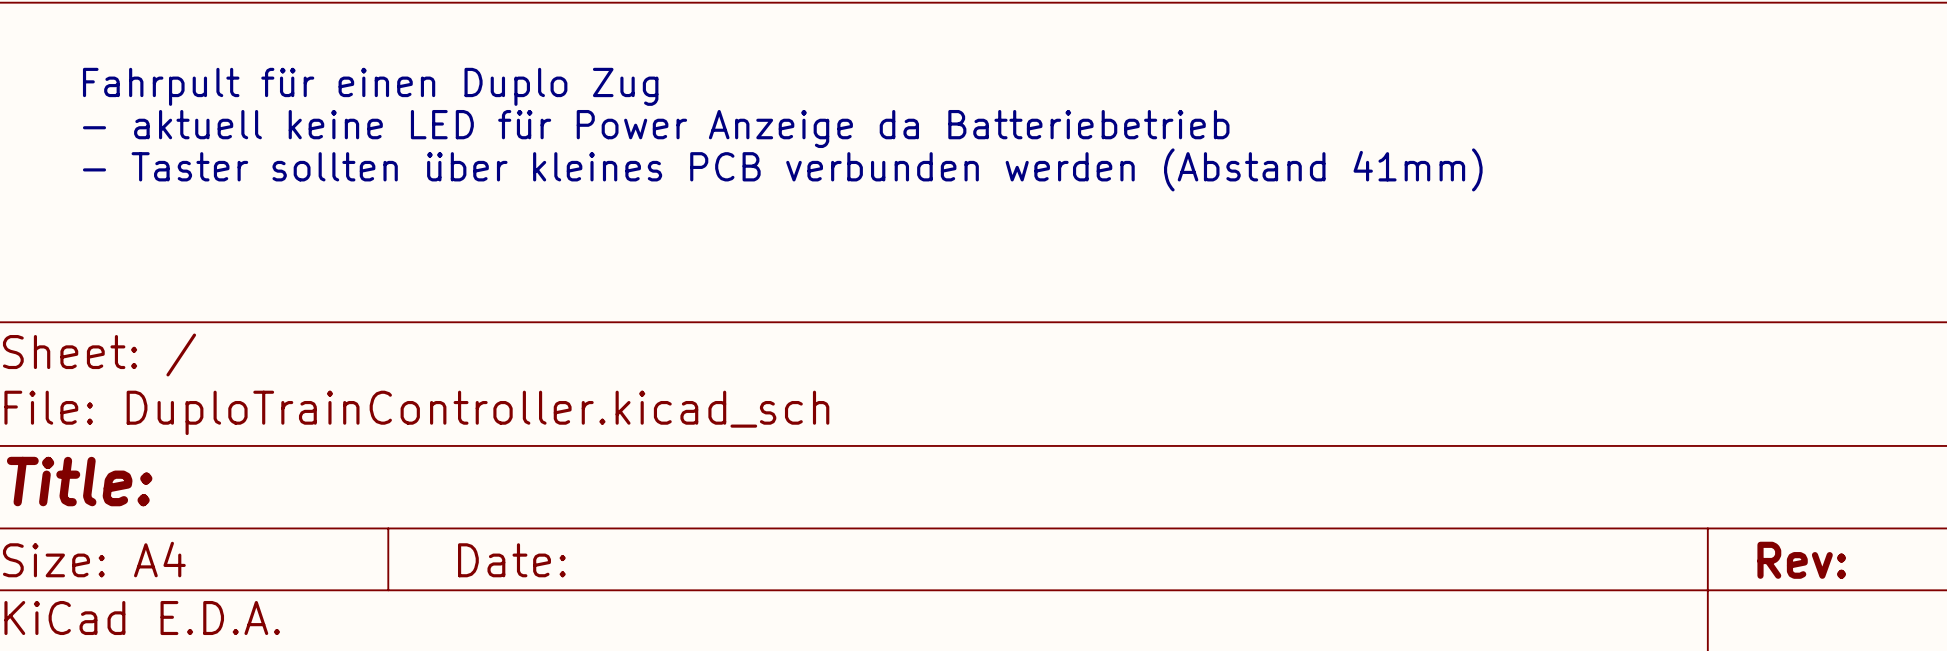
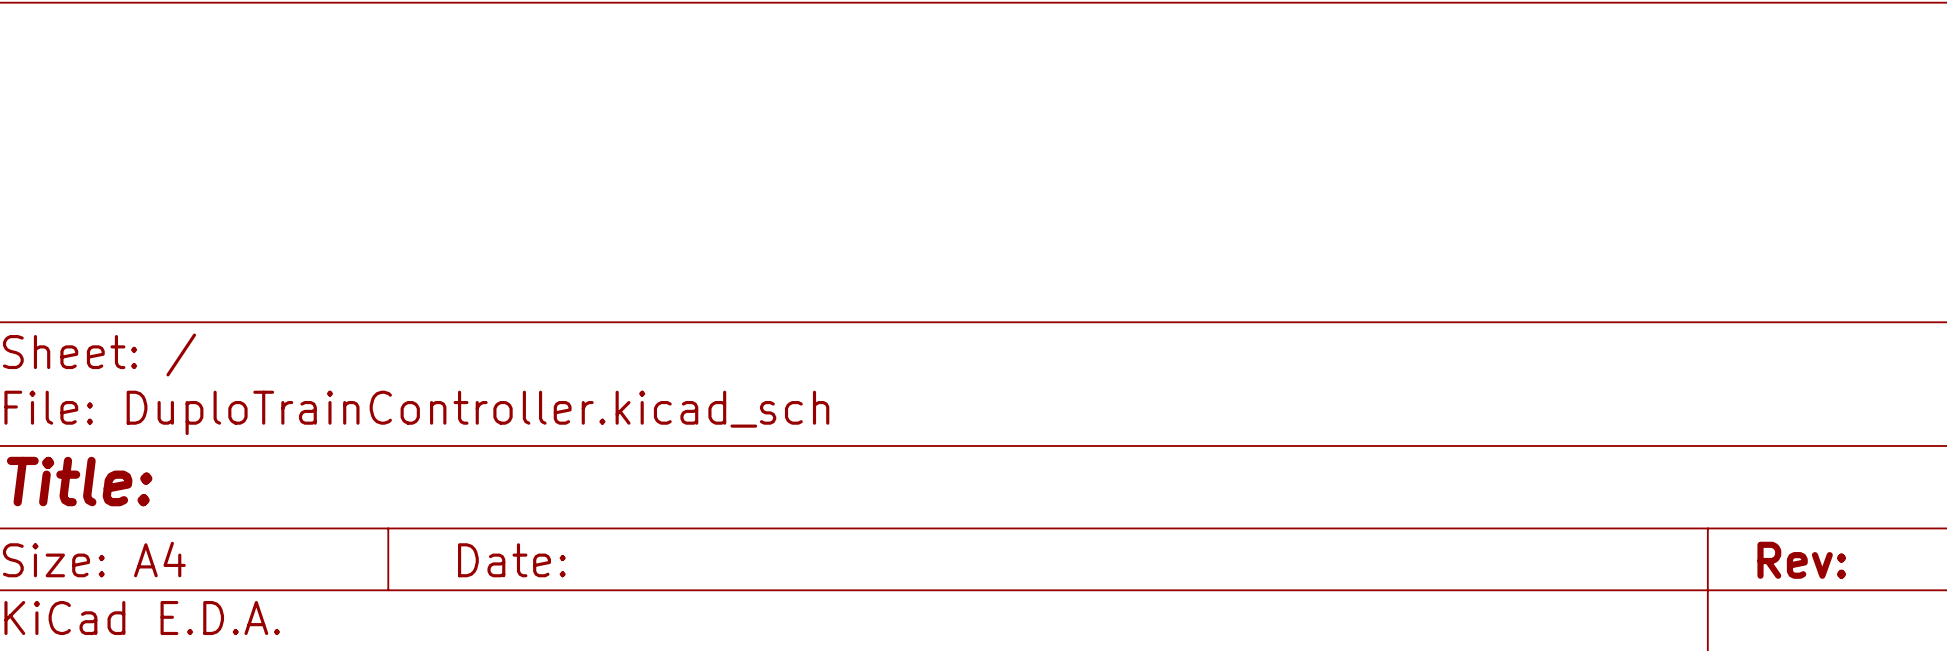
text: Fahrpult für einen Duplo Zug (370, 86) -> none
text: - aktuell keine LED für Power Anzeige da Batteriebetrieb (656, 129) -> none
text: - Taster sollten über kleines PCB verbunden werden (Abstand 41mm) (782, 169) -> none

